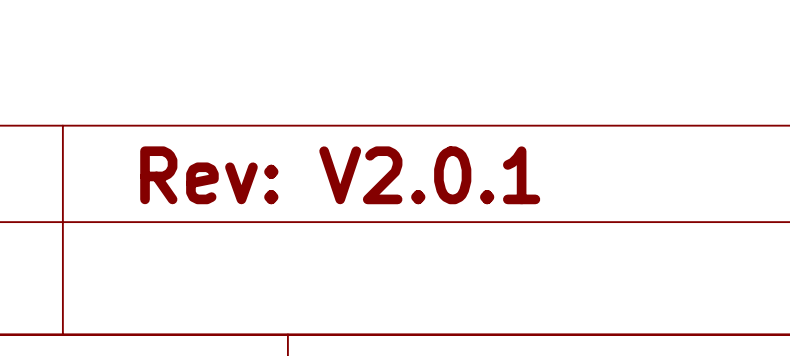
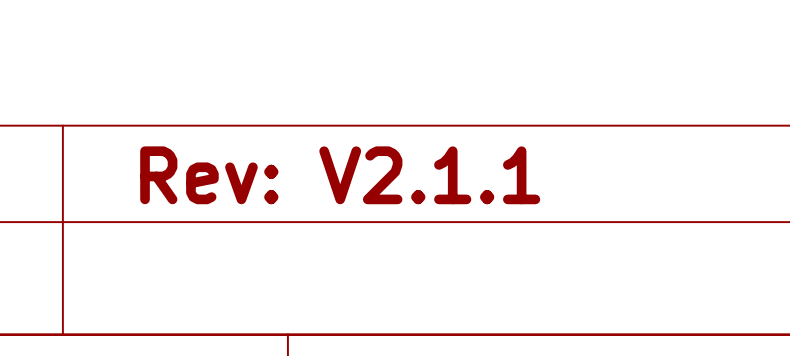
title block: Rev: V2.0.1 (340, 175) -> Rev: V2.1.1 (340, 175)

